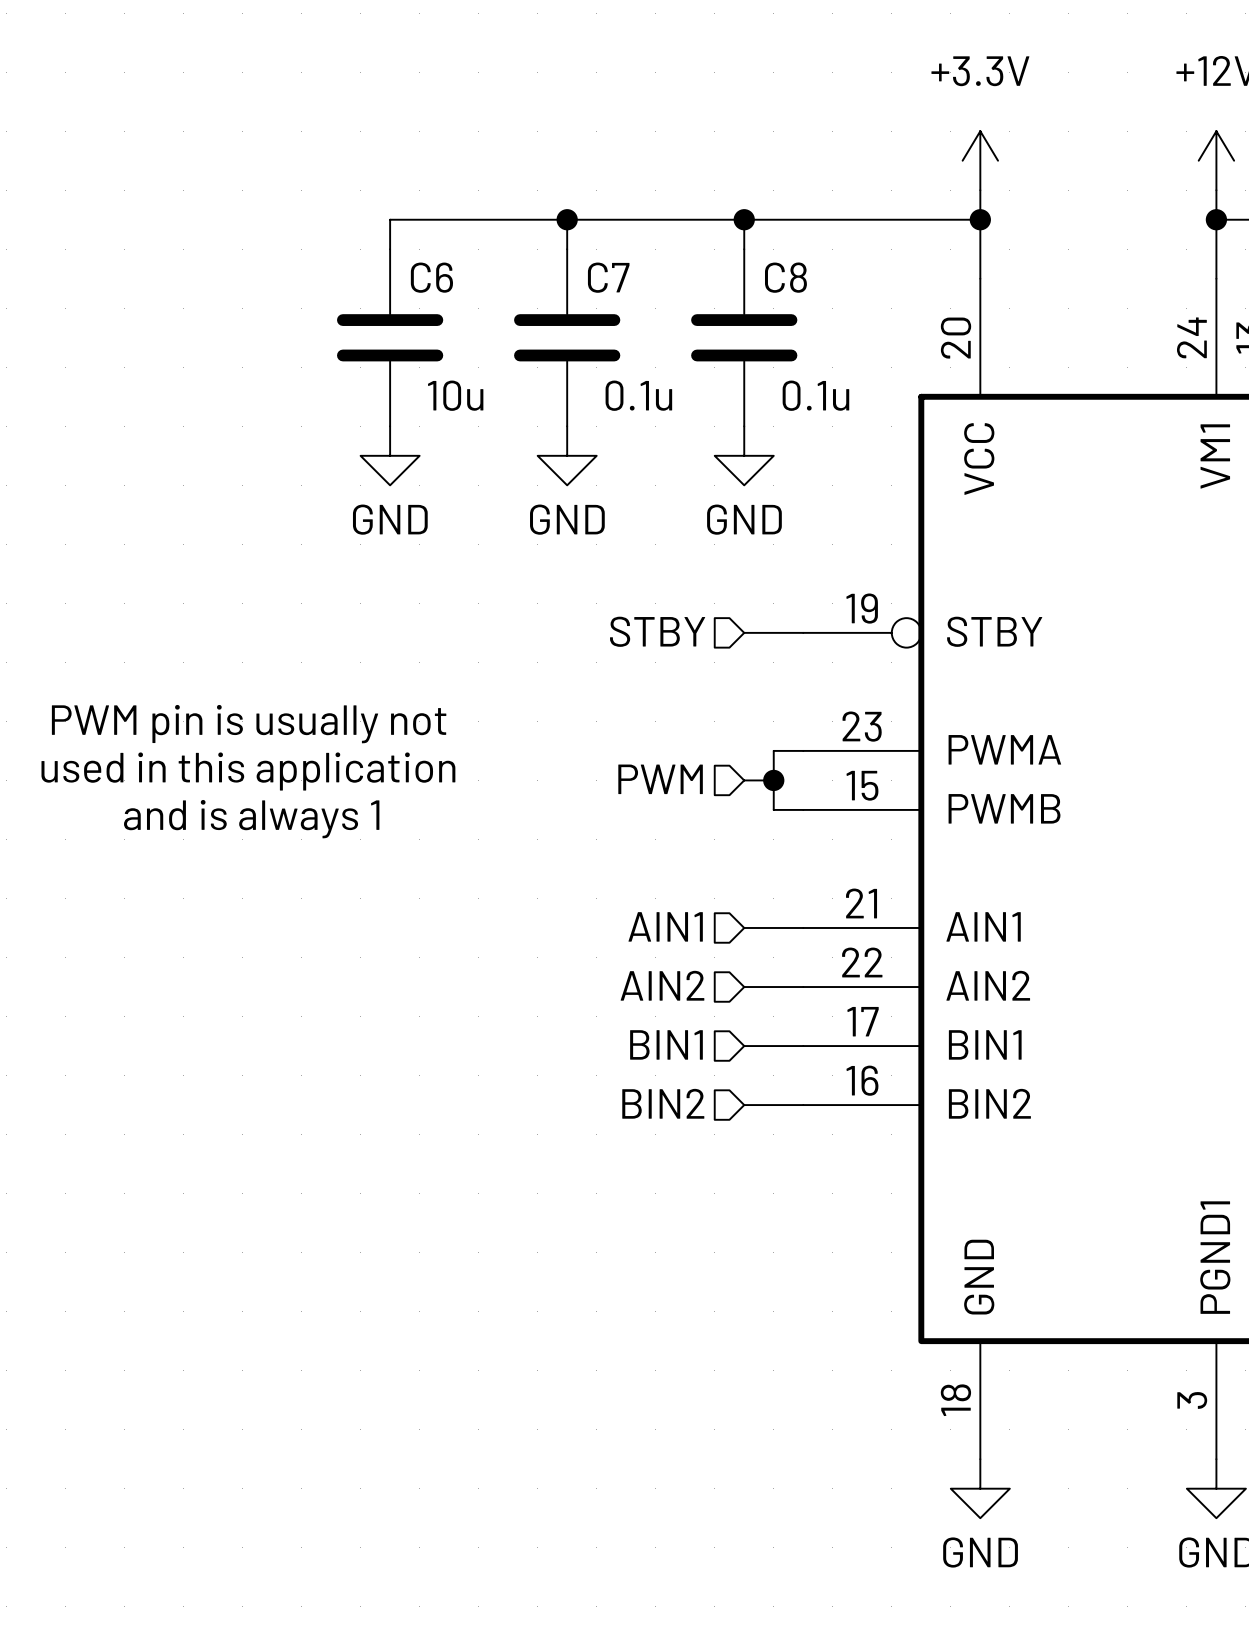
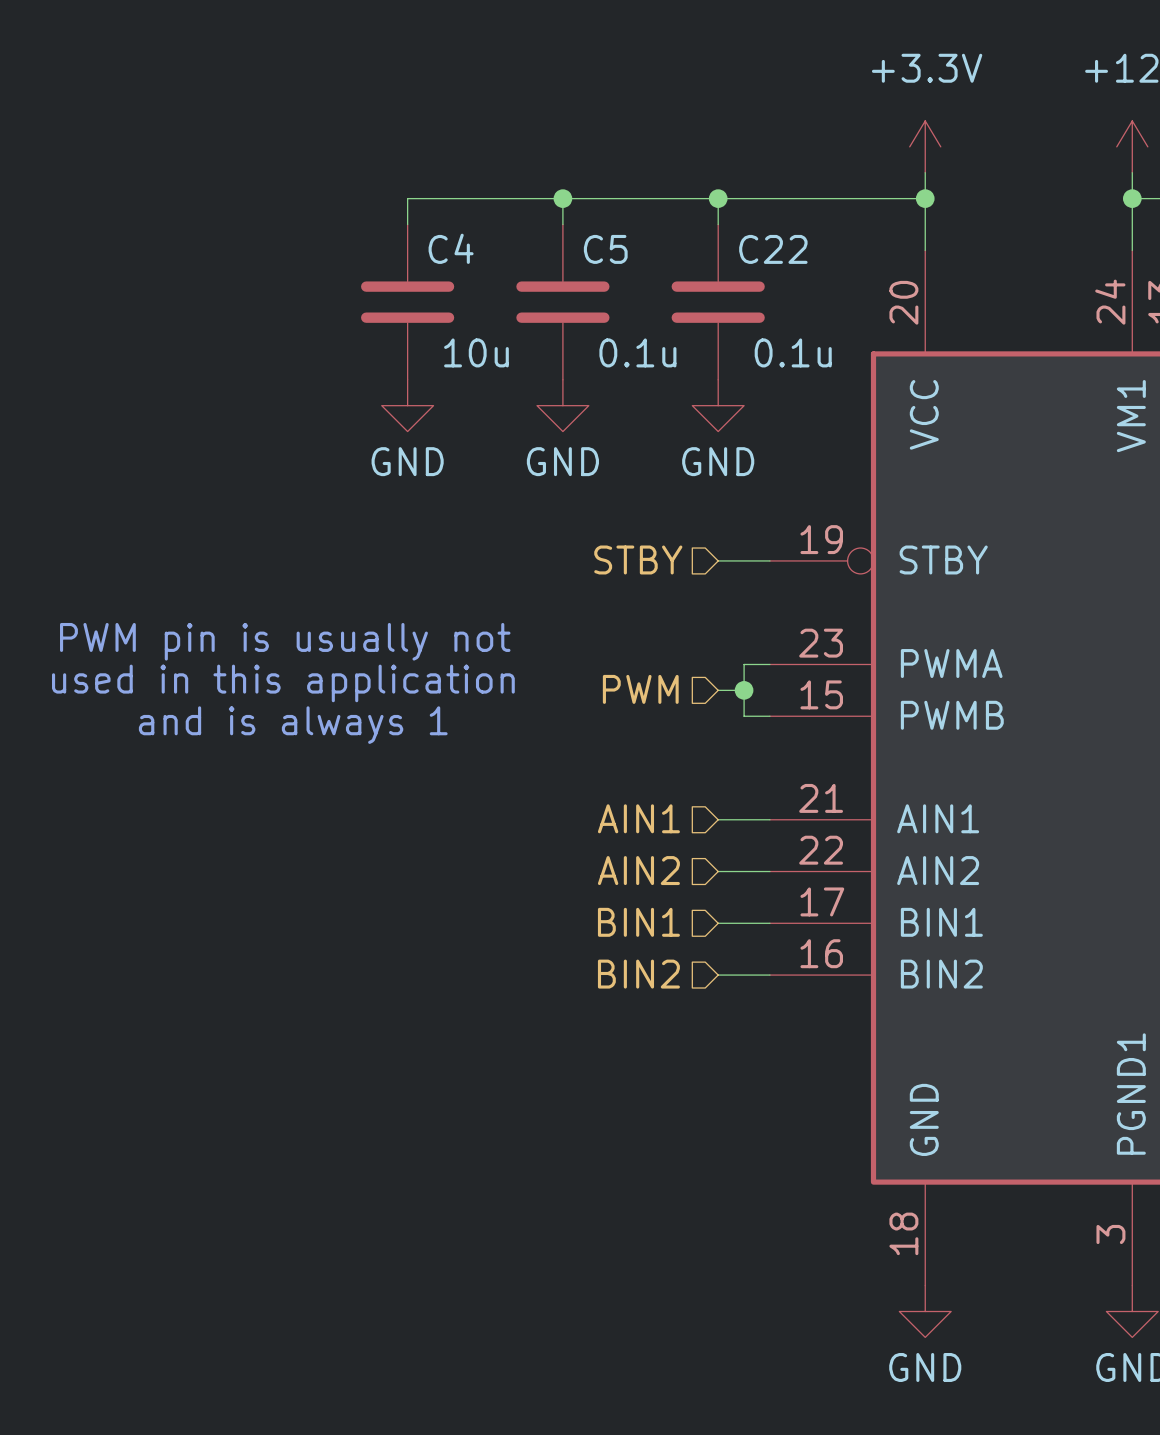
C6 name: C6 (431, 277) -> C4 (451, 248)
C7 name: C7 (608, 277) -> C5 (605, 249)
C8 name: C8 (785, 277) -> C22 (773, 249)

